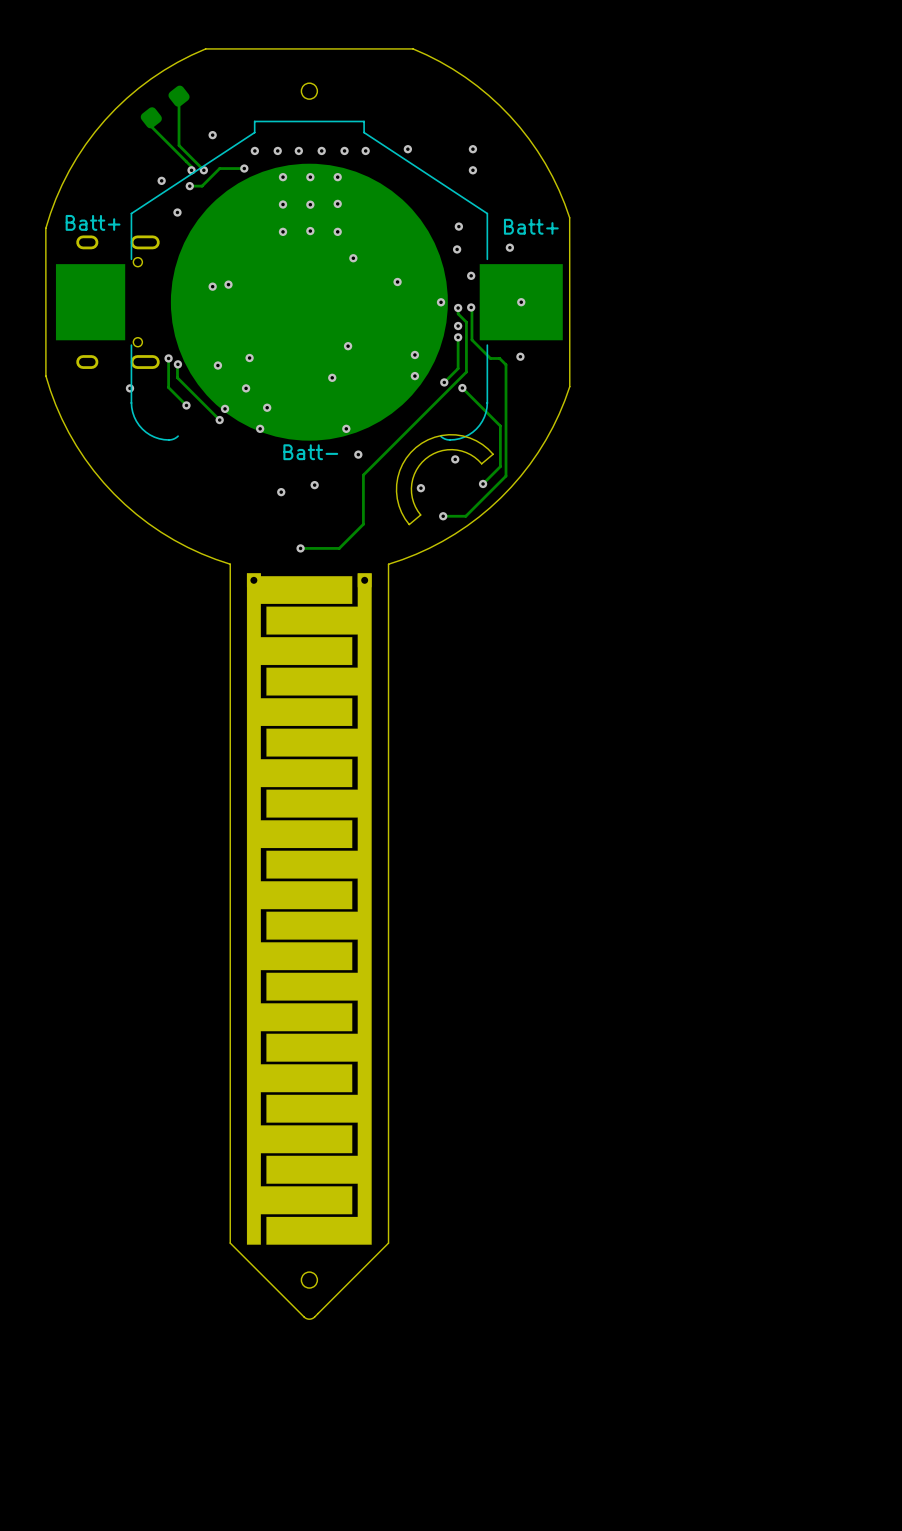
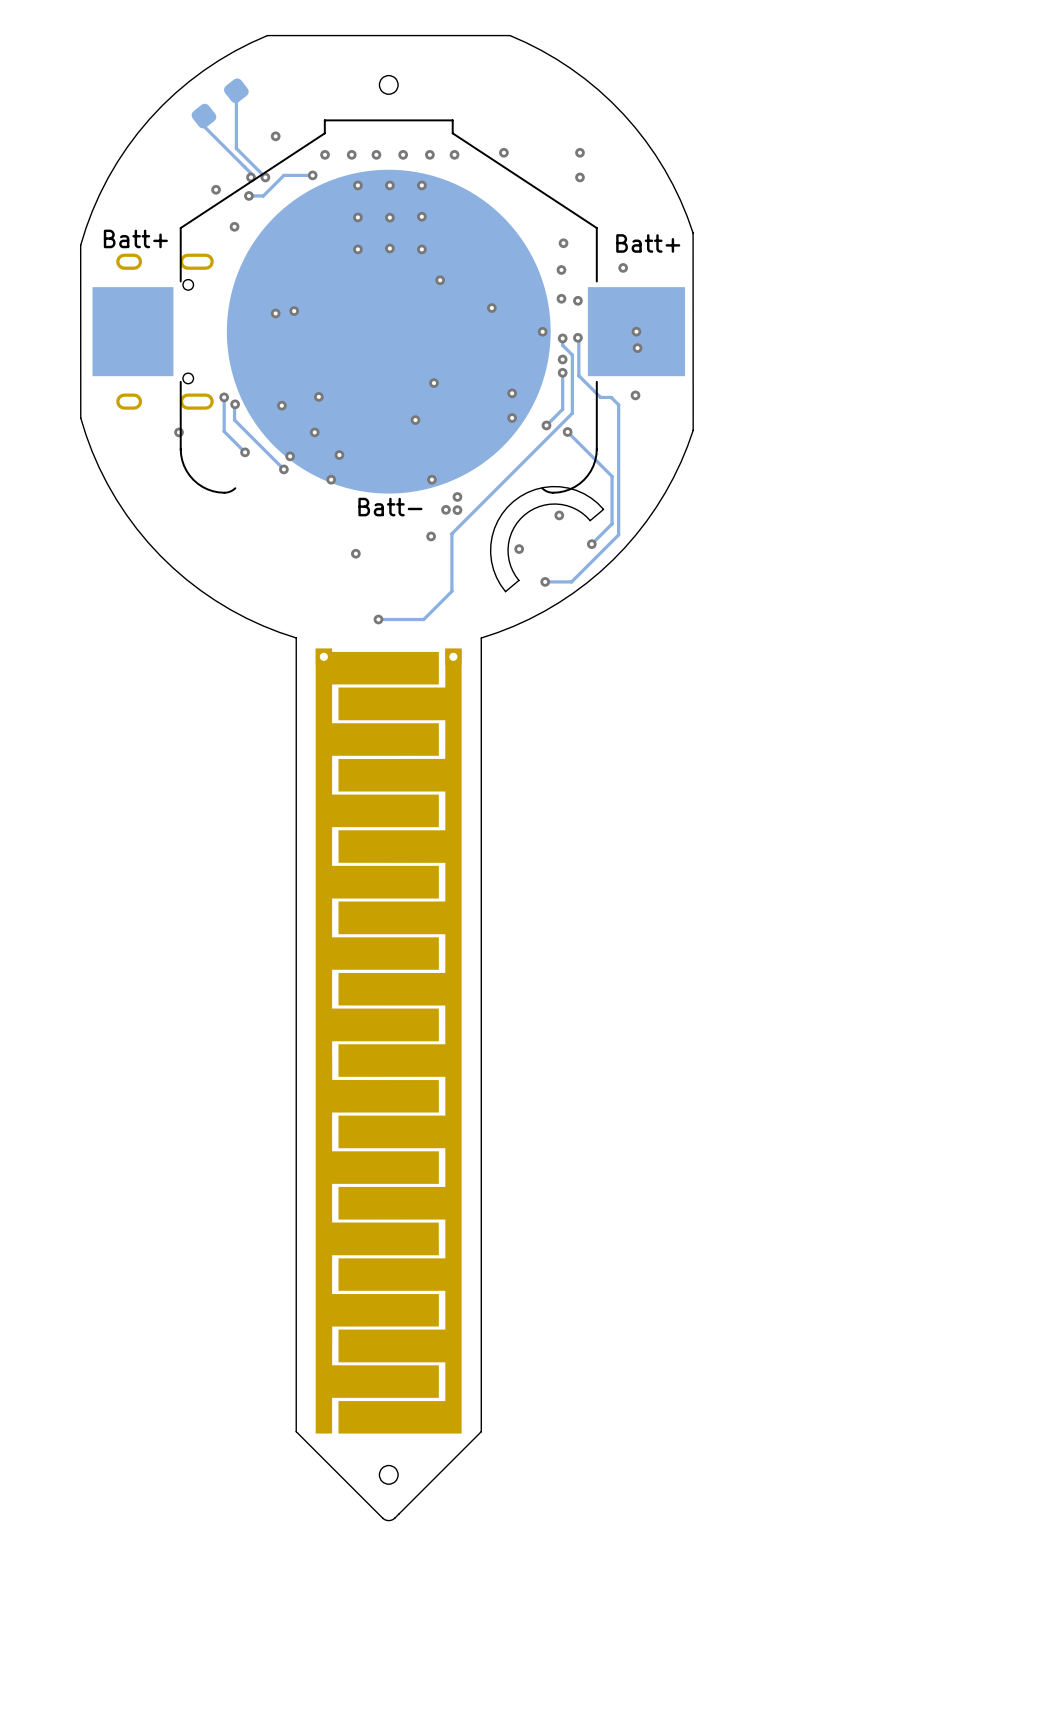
via: none -> (561, 298)
via: none -> (637, 348)
via: none -> (457, 496)
via: none -> (457, 510)
via: none -> (431, 536)
via: (314, 485) -> none

